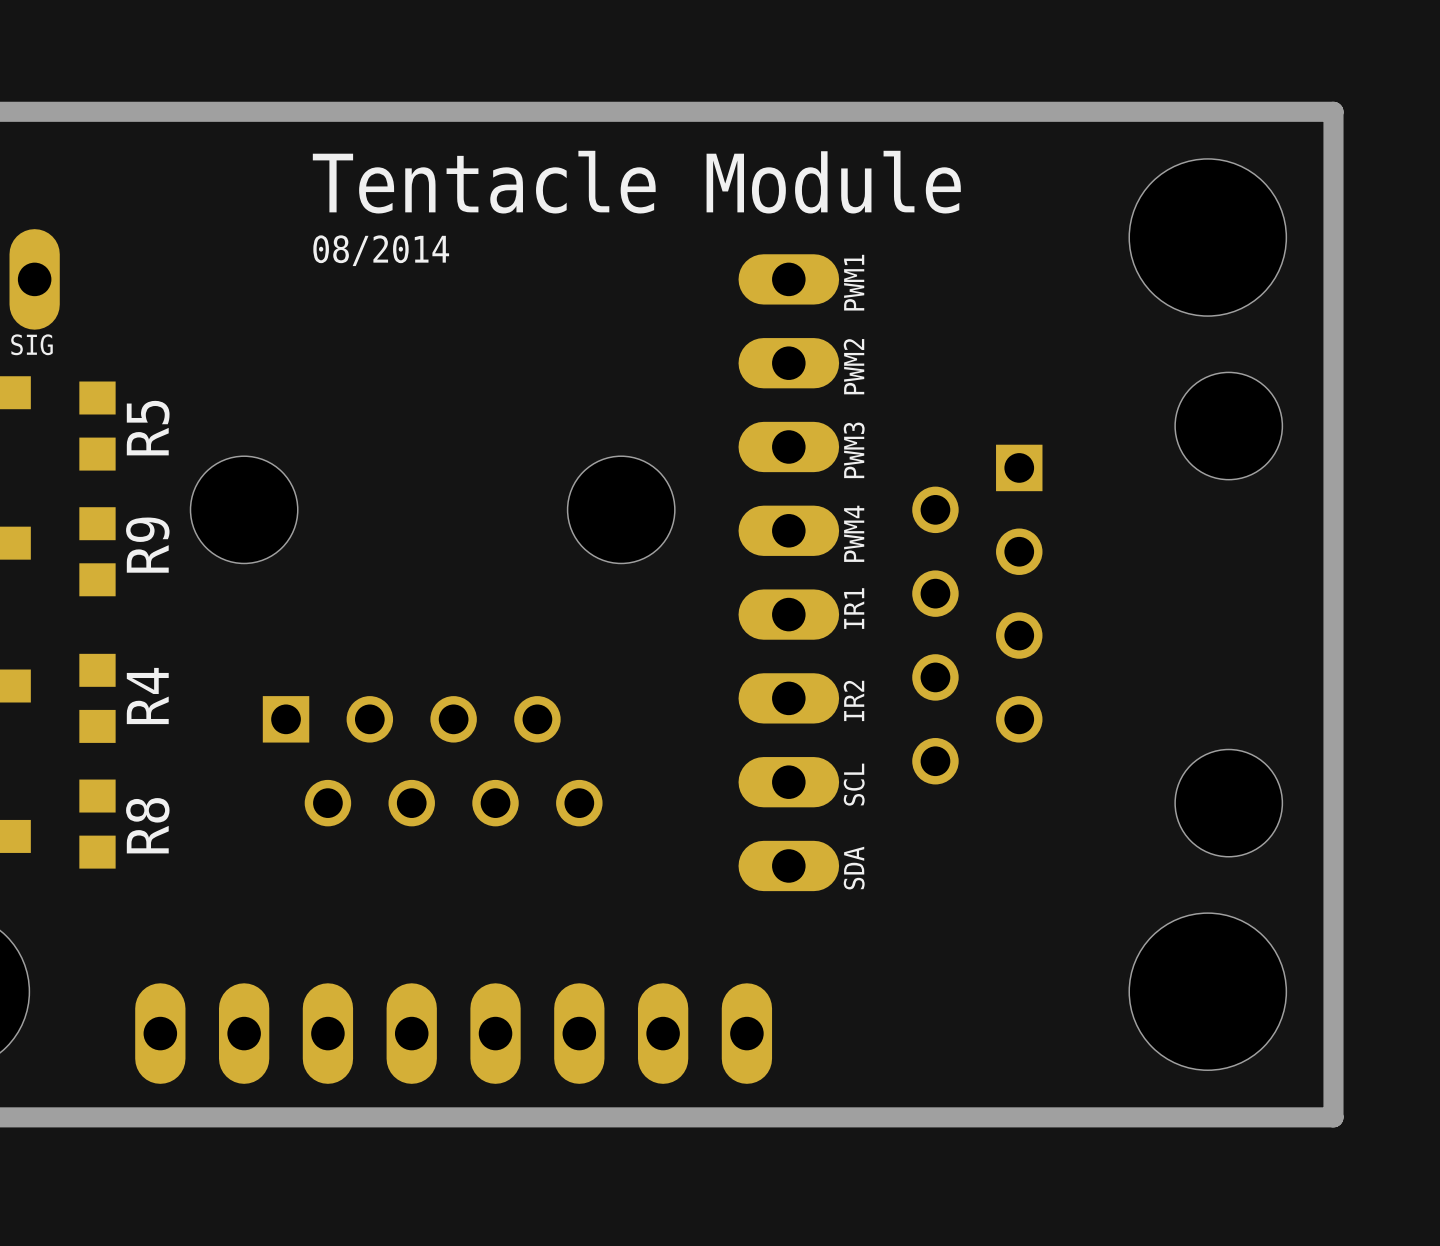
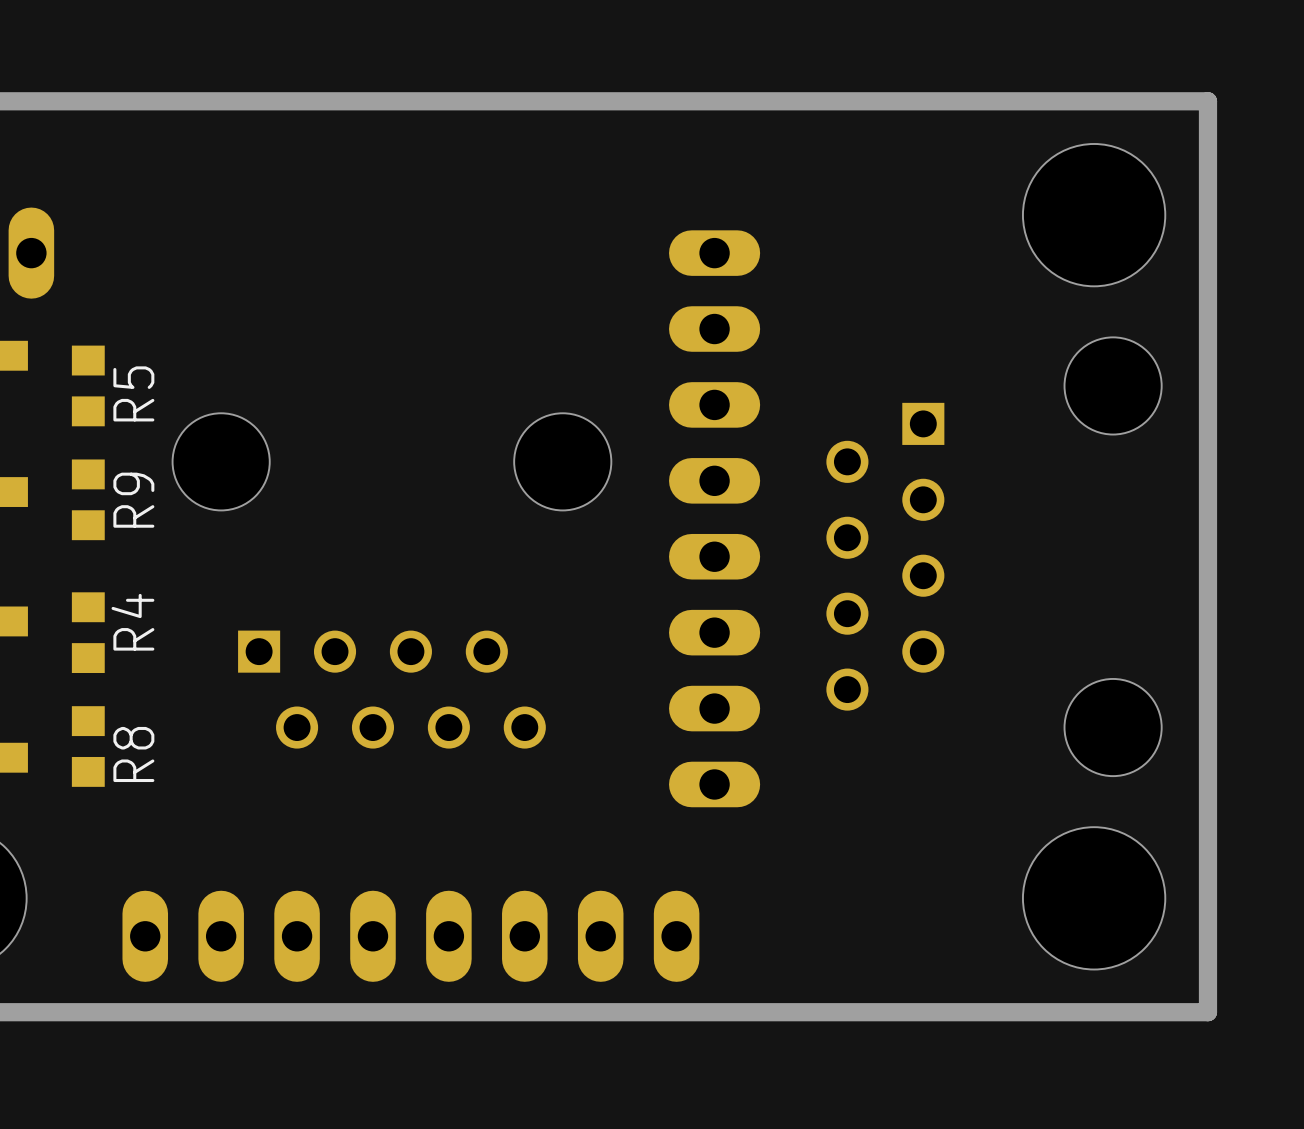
text: Tentacle Module (636, 182) -> none
text: 08/2014 (381, 250) -> none
text: PWM1 (854, 282) -> none
text: SIG (31, 344) -> none
text: PWM2 (853, 366) -> none
text: PWM3 (854, 450) -> none
text: PWM4 (854, 533) -> none
text: IR1 (854, 608) -> none
text: IR2 (853, 700) -> none
text: SCL (854, 784) -> none
text: SDA (854, 868) -> none

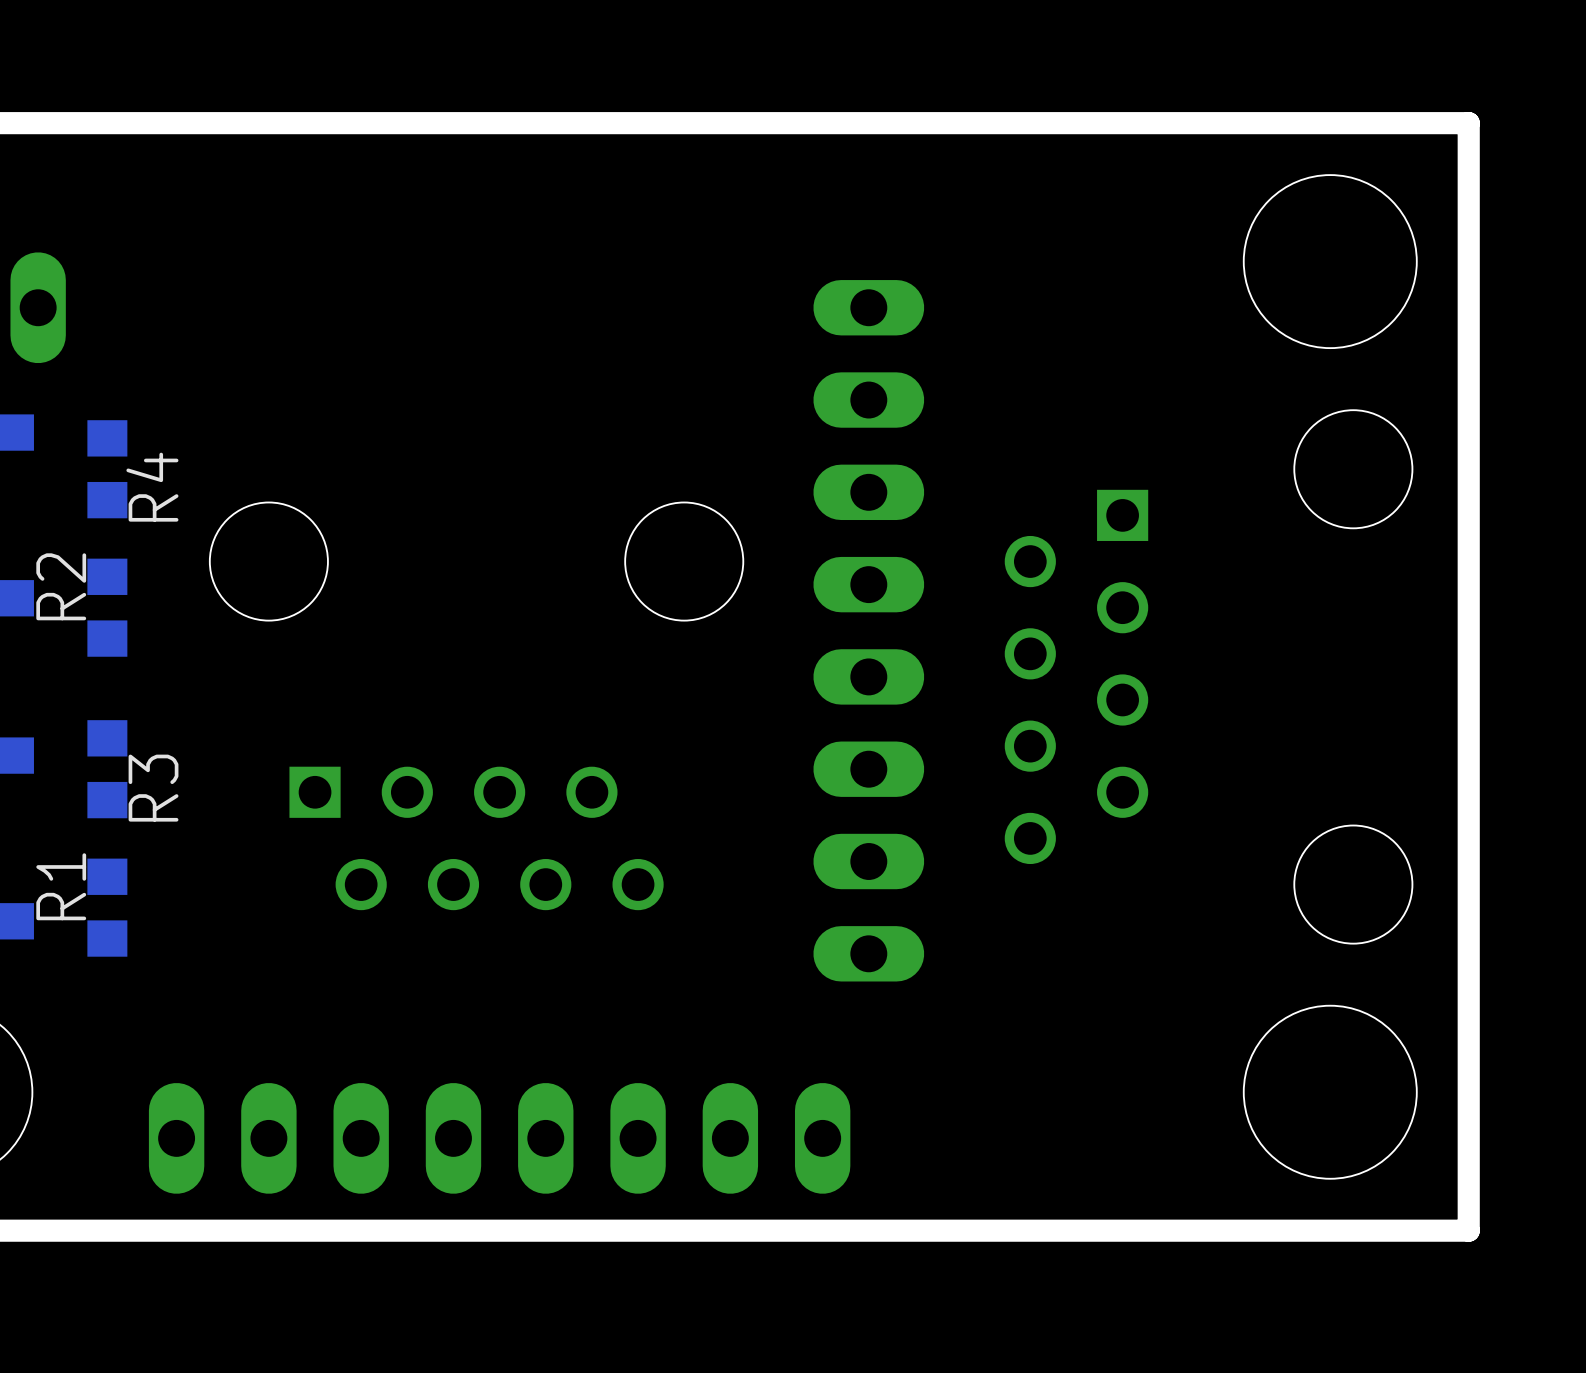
R5 name: R5 (133, 393) -> R4 (152, 487)
R9 name: R9 (133, 500) -> R2 (61, 586)
R4 name: R4 (132, 622) -> R3 (153, 788)
R8 name: R8 (133, 754) -> R1 (61, 886)

